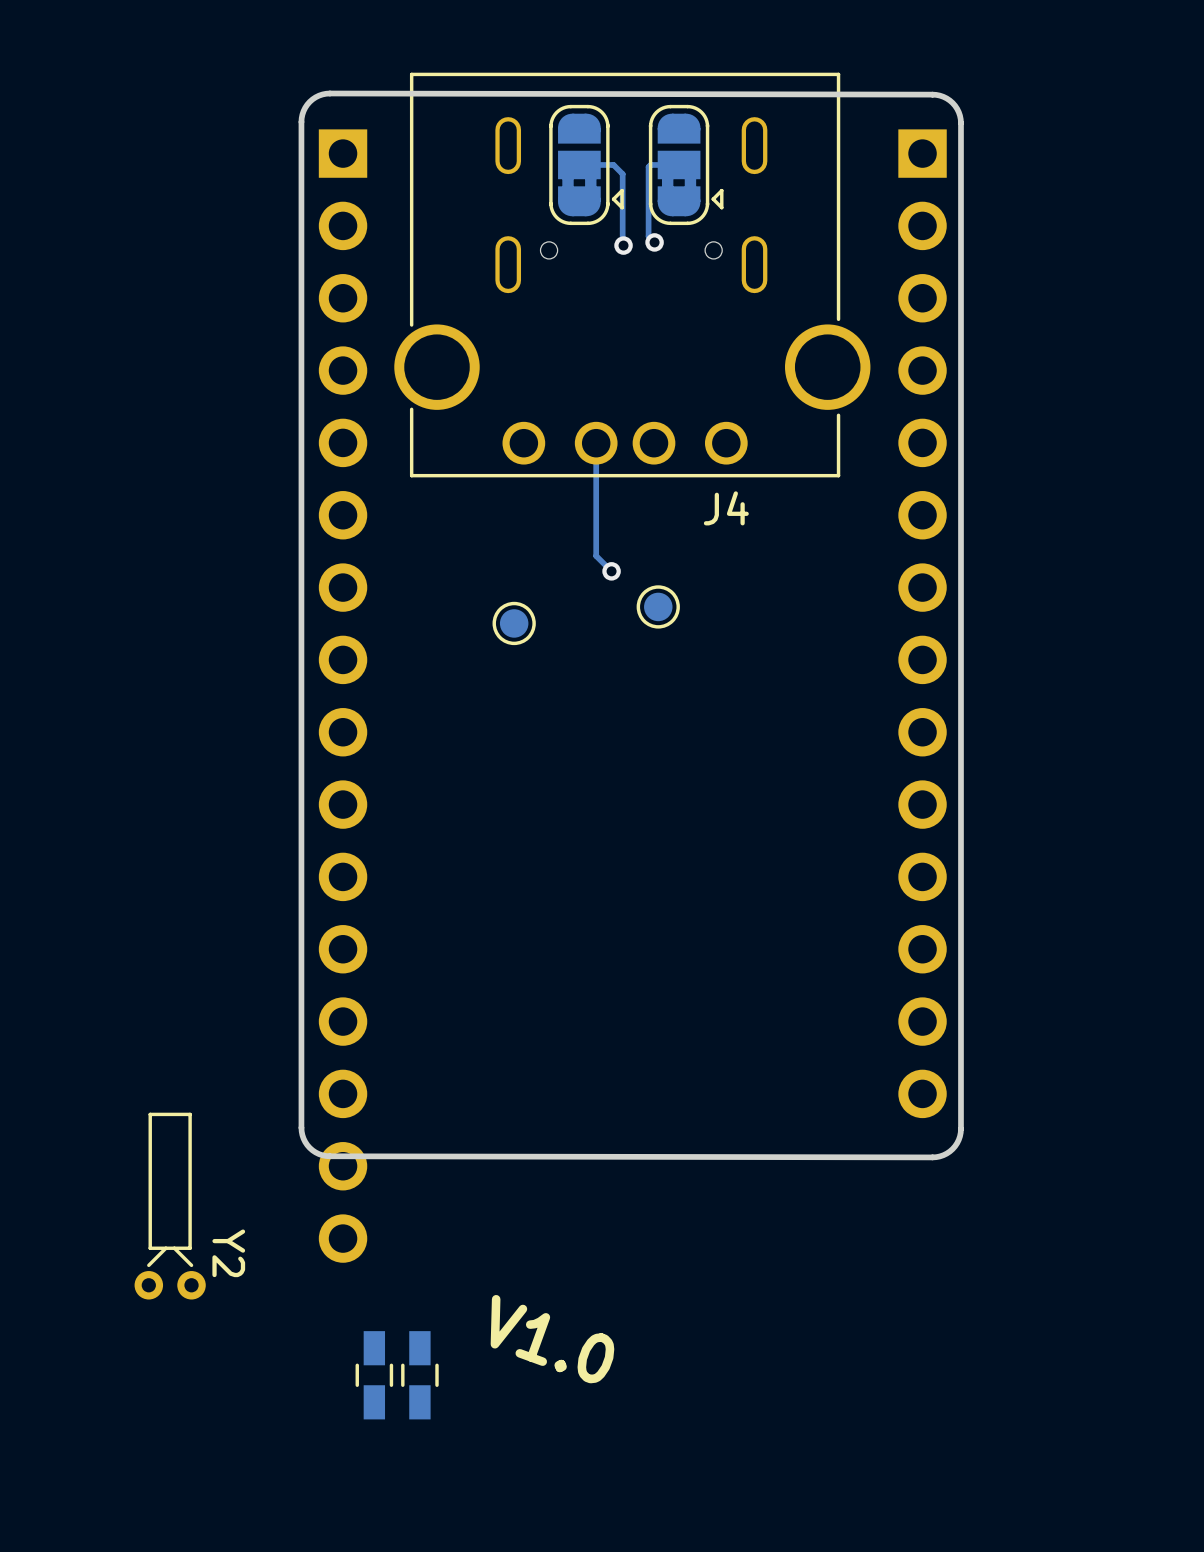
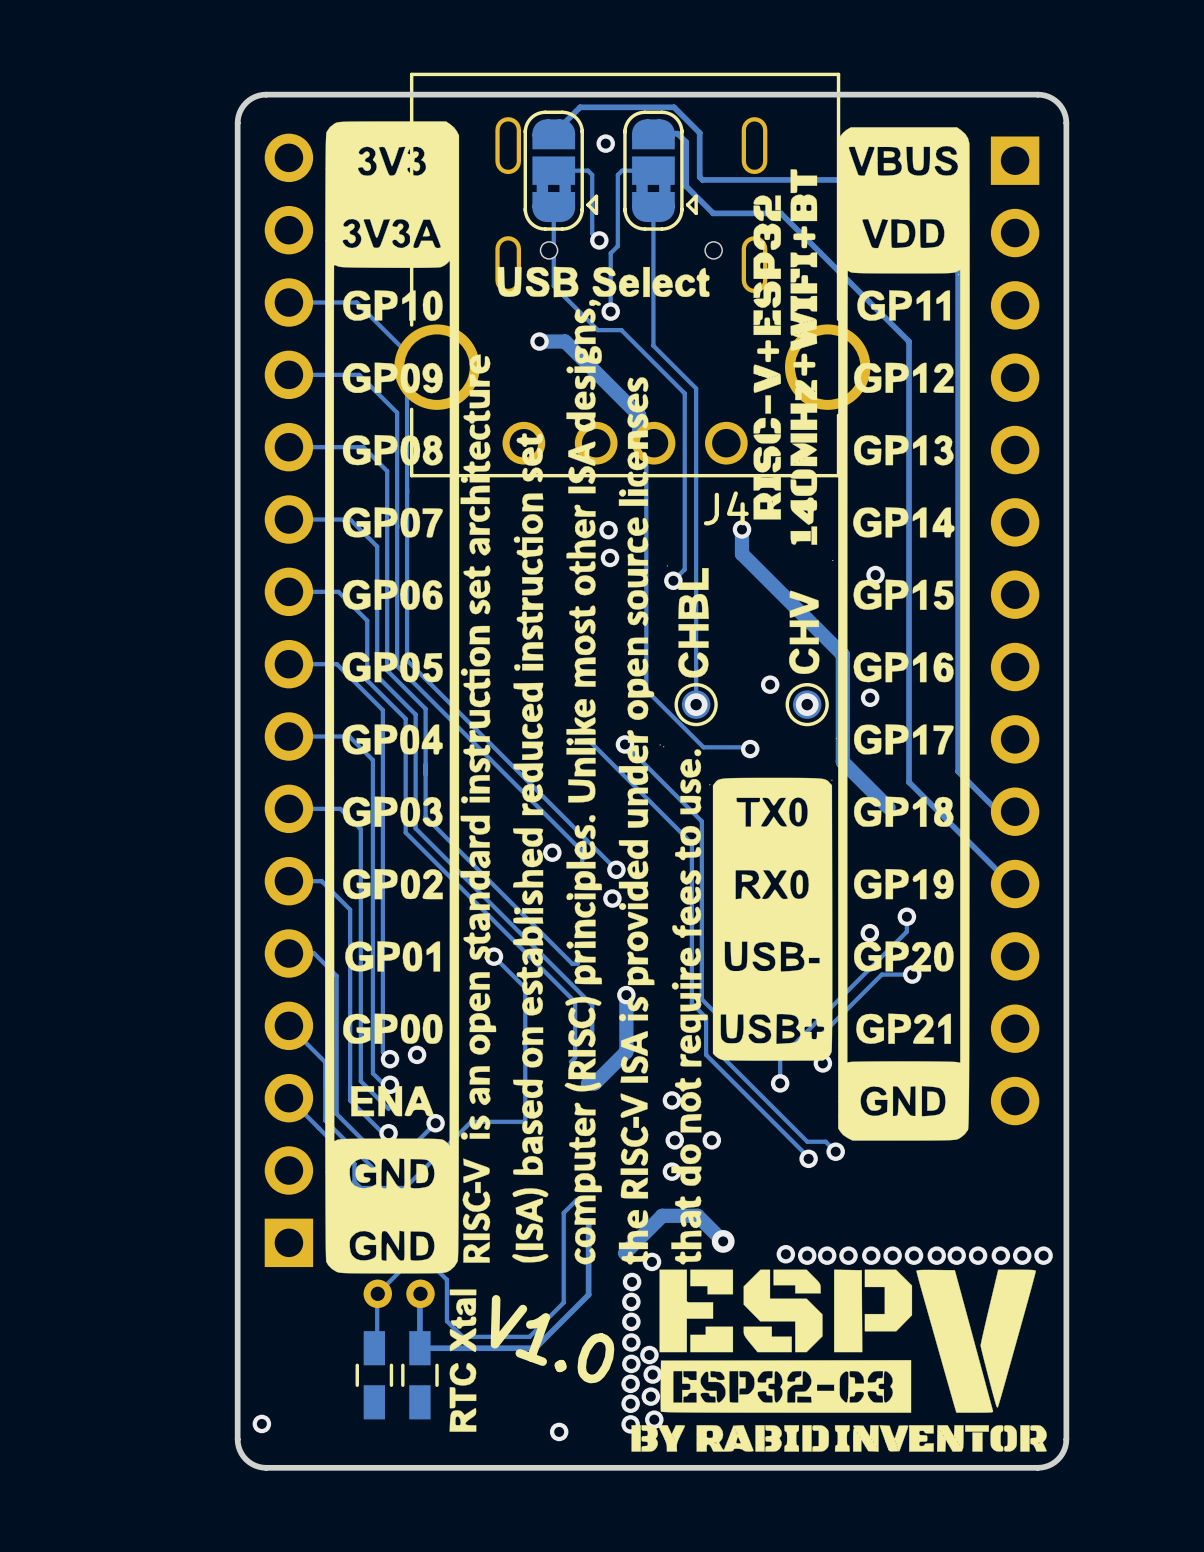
board edge: (329, 93) (932, 94) (946, 98) (957, 108) (960, 123) (960, 1128) (957, 1143) (946, 1153) (932, 1157) (329, 1156) (315, 1152) (305, 1142) (301, 1127) (301, 121) (303, 111) (309, 101) (319, 95) (329, 93) -> (1037, 94) (1048, 96) (1058, 102) (1064, 112) (1066, 123) (1066, 1439) (1062, 1453) (1052, 1464) (1037, 1467) (266, 1467) (251, 1464) (241, 1453) (237, 1439) (237, 123) (241, 108) (251, 98) (266, 94) (1037, 94)
drawing: none -> [324, 121, 1047, 1452]
track: none -> (553, 133) (580, 107) (674, 107) (699, 132) (699, 177) (702, 179) (918, 179) (958, 219) (958, 771) (998, 811) (1015, 811)
track: none -> (653, 133) (677, 133) (686, 142) (686, 186) (713, 213) (780, 213) (909, 341) (909, 782) (1010, 884) (1015, 884)
via: none -> (605, 143)
track: (579, 164) (613, 164) (622, 174) (623, 245) -> none
part position: (586, 164) -> (560, 170)
track: (679, 164) (650, 164) (648, 166) (648, 236) (654, 242) -> none
part position: (686, 164) -> (660, 170)
track: none -> (553, 170) (587, 170) (592, 174) (592, 233) (599, 240)
track: none -> (653, 170) (622, 170) (617, 174) (617, 246) (610, 253) (610, 311)
track: none -> (553, 207) (553, 286) (597, 330) (621, 330) (684, 393) (684, 569) (673, 580)
track: none -> (653, 207) (653, 345) (696, 388) (696, 704)
via: (654, 242) -> none
via position: (623, 245) -> (599, 240)
track: none -> (288, 302) (356, 302) (407, 352) (407, 660) (616, 869)
via: none -> (610, 311)
track: none -> (539, 341) (565, 341) (639, 415) (639, 446) (646, 453) (646, 690) (703, 747) (748, 747) (750, 749)
via: none -> (539, 341)
track: none -> (288, 374) (359, 374) (397, 412) (397, 666) (582, 851) (582, 863)
track: (596, 443) (596, 555) (611, 571) -> none
track: none -> (288, 447) (363, 447) (387, 471) (387, 670) (425, 708) (425, 817) (572, 963) (577, 963)
track: none -> (288, 519) (350, 519) (377, 546) (377, 676) (415, 714) (415, 828) (592, 1005) (592, 1043)
track: none -> (741, 529) (741, 553) (842, 654) (842, 761) (888, 807)
via: none -> (741, 529)
via: none -> (608, 530)
via position: (611, 571) -> (610, 557)
via: none -> (875, 575)
via: none -> (673, 580)
track: none -> (288, 591) (338, 591) (367, 620) (367, 680) (405, 718) (405, 832) (575, 1002) (575, 1057) (570, 1062)
part: (658, 606) -> none
part: (514, 623) -> none
part position: (922, 623) -> (1015, 630)
track: none -> (288, 664) (336, 664) (382, 710) (382, 1052) (390, 1059)
via: none -> (770, 684)
part rotation: 0° (343, 696) -> 180° (288, 700)
via: none -> (870, 697)
part: none -> (696, 704)
via: none -> (696, 704)
part: none -> (807, 704)
via: none -> (807, 704)
track: none -> (288, 736) (349, 736) (372, 760) (372, 1073) (384, 1084) (390, 1084)
track: none -> (590, 741) (691, 843) (691, 1003)
track: none -> (624, 744) (701, 821) (701, 999) (716, 1013) (716, 1050) (807, 1141) (825, 1141) (835, 1151)
via: none -> (624, 744)
via: none -> (750, 749)
track: none -> (288, 808) (340, 808) (360, 829) (360, 1081) (388, 1109)
via: none -> (552, 852)
via: none -> (616, 869)
track: none -> (288, 881) (321, 881) (350, 909) (350, 1100) (382, 1133) (388, 1133)
via: none -> (612, 898)
track: none -> (906, 916) (906, 931) (780, 1058) (780, 1083)
via: none -> (906, 916)
via: none -> (869, 933)
track: none -> (288, 953) (314, 953) (336, 975) (336, 1113) (374, 1151) (407, 1151) (435, 1123)
track: none -> (493, 956) (525, 987) (525, 1121) (471, 1121) (404, 1188) (360, 1188) (354, 1181) (354, 1163) (288, 1098)
via: none -> (493, 956)
track: none -> (912, 974) (881, 974) (822, 1033) (822, 1063)
via: none -> (912, 974)
track: none -> (626, 995) (626, 1051) (594, 1083) (587, 1083)
via: none -> (626, 995)
track: none -> (692, 1003) (706, 1017) (706, 1054) (808, 1158)
track: none -> (288, 1025) (325, 1062) (325, 1120) (374, 1169) (377, 1169)
via: none -> (417, 1054)
via: none -> (390, 1059)
via: none -> (822, 1063)
via: none -> (780, 1083)
via: none -> (390, 1084)
via: none -> (671, 1100)
via: none -> (435, 1123)
via: none -> (388, 1133)
via: none -> (674, 1140)
via: none -> (711, 1140)
via: none -> (835, 1151)
via: none -> (808, 1158)
via: none -> (671, 1171)
track: none -> (582, 1200) (576, 1200) (563, 1212) (563, 1302) (529, 1336) (462, 1336) (446, 1321) (446, 1279) (434, 1267) (404, 1267) (377, 1294) (377, 1345) (374, 1348)
Y2: (170, 1206) -> none
track: none -> (589, 1224) (588, 1294) (535, 1348) (419, 1348) (418, 1294)
track: none -> (723, 1241) (697, 1215) (662, 1215) (624, 1253)
via: none -> (723, 1241)
via: none -> (785, 1254)
via: none -> (807, 1255)
via: none -> (827, 1255)
via: none -> (848, 1255)
via: none -> (871, 1255)
via: none -> (892, 1255)
via: none -> (914, 1255)
via: none -> (936, 1255)
via: none -> (956, 1255)
via: none -> (978, 1255)
via: none -> (1000, 1255)
via: none -> (1022, 1255)
via: none -> (1043, 1255)
via: none -> (652, 1261)
via: none -> (632, 1282)
part: none -> (399, 1293)
via: none -> (631, 1301)
via: none -> (631, 1321)
via: none -> (631, 1342)
via: none -> (649, 1355)
via: none -> (631, 1363)
via: none -> (652, 1374)
via: none -> (630, 1383)
via: none -> (650, 1396)
via: none -> (630, 1403)
via: none -> (654, 1419)
via: none -> (261, 1423)
via: none -> (630, 1424)
via: none -> (559, 1431)

